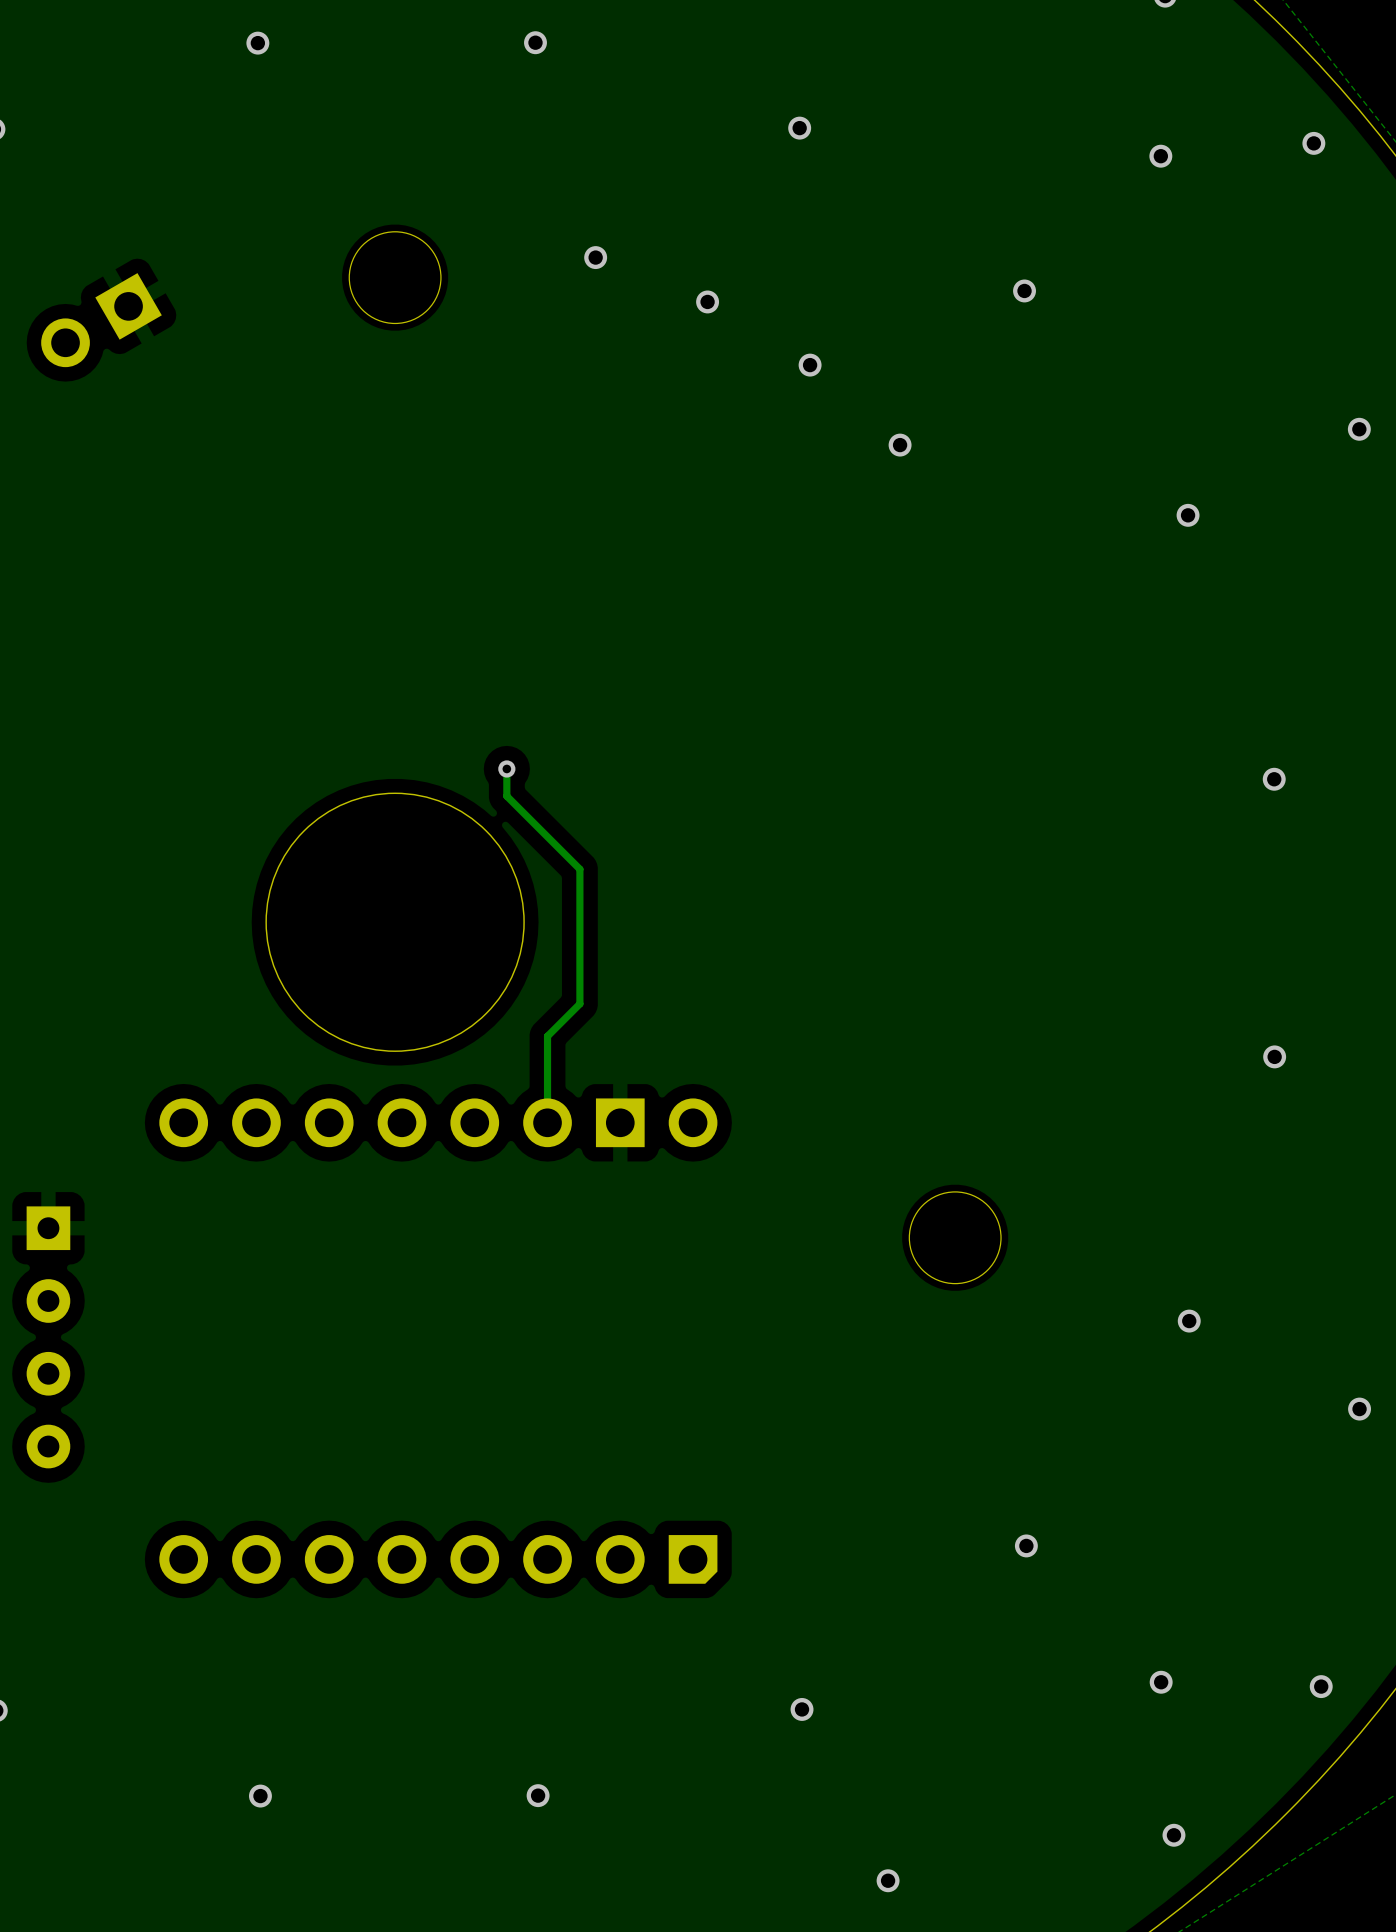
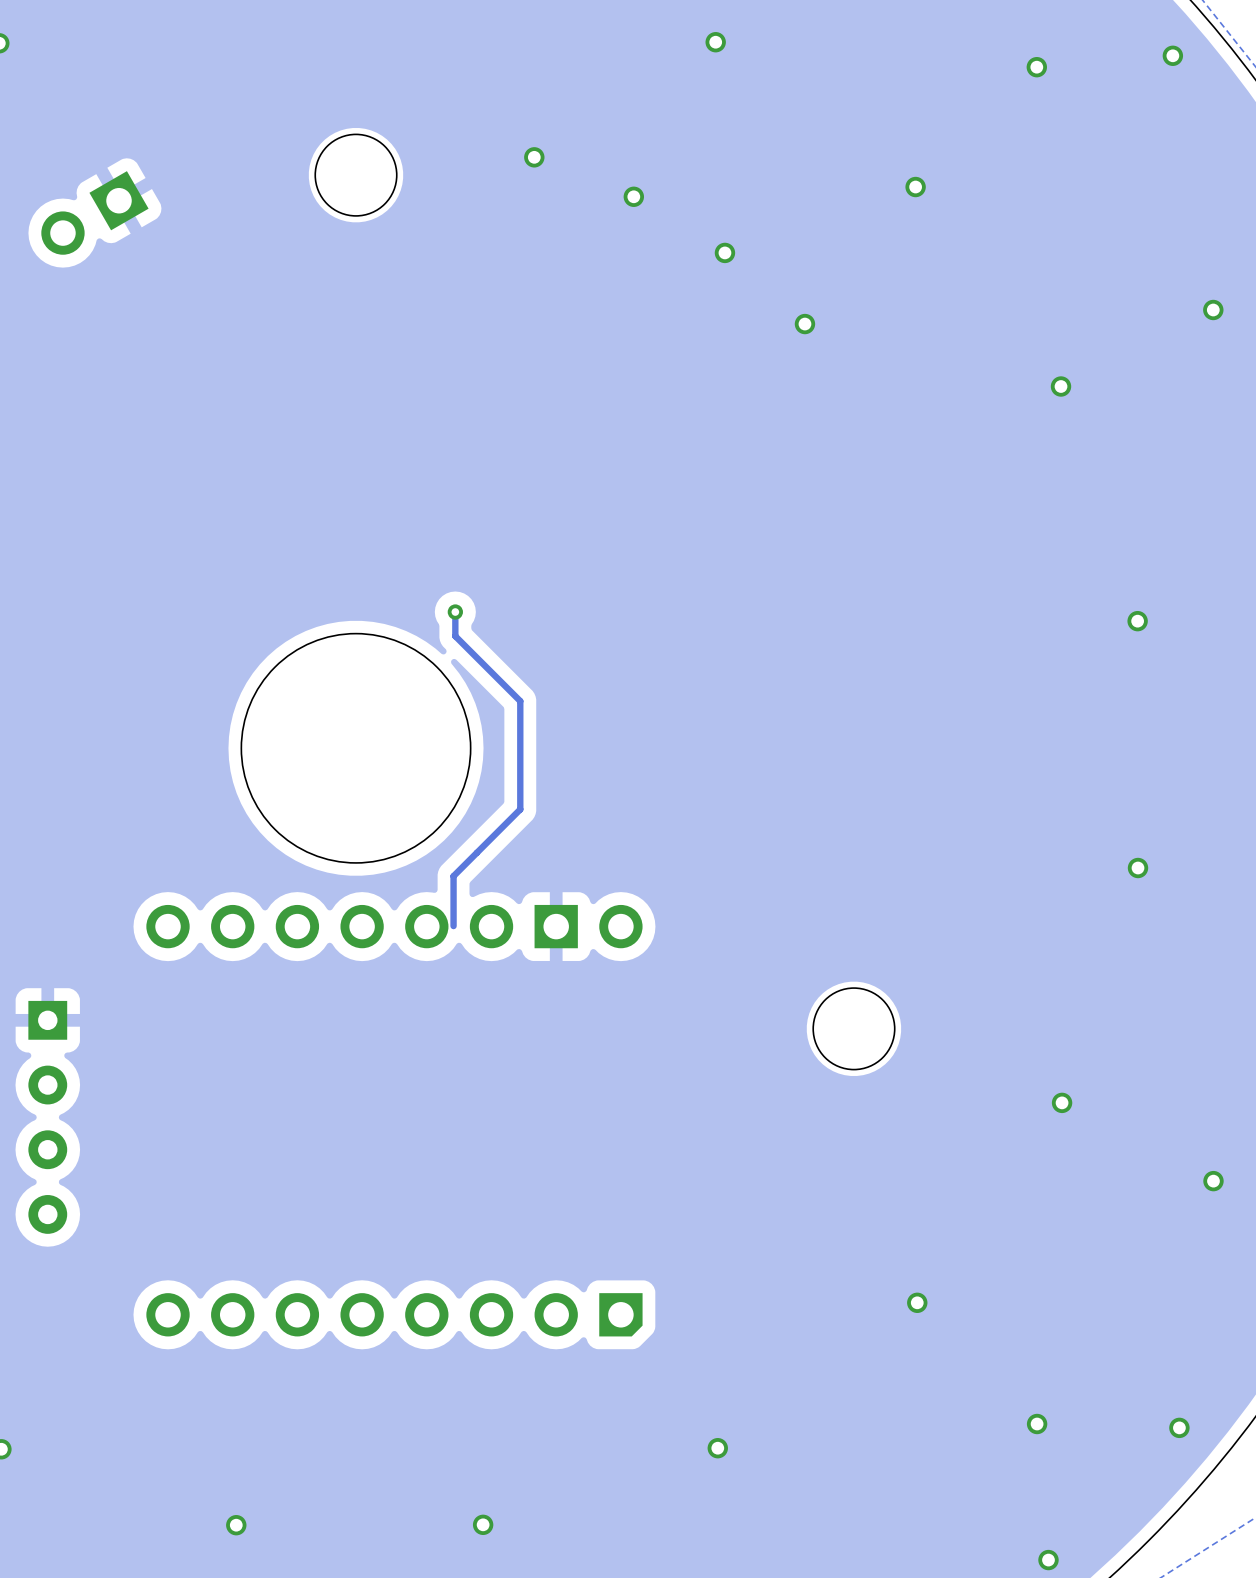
track: (579, 991) (579, 1003) (547, 1036) (547, 1122) -> (520, 809) (453, 876) (453, 926)

